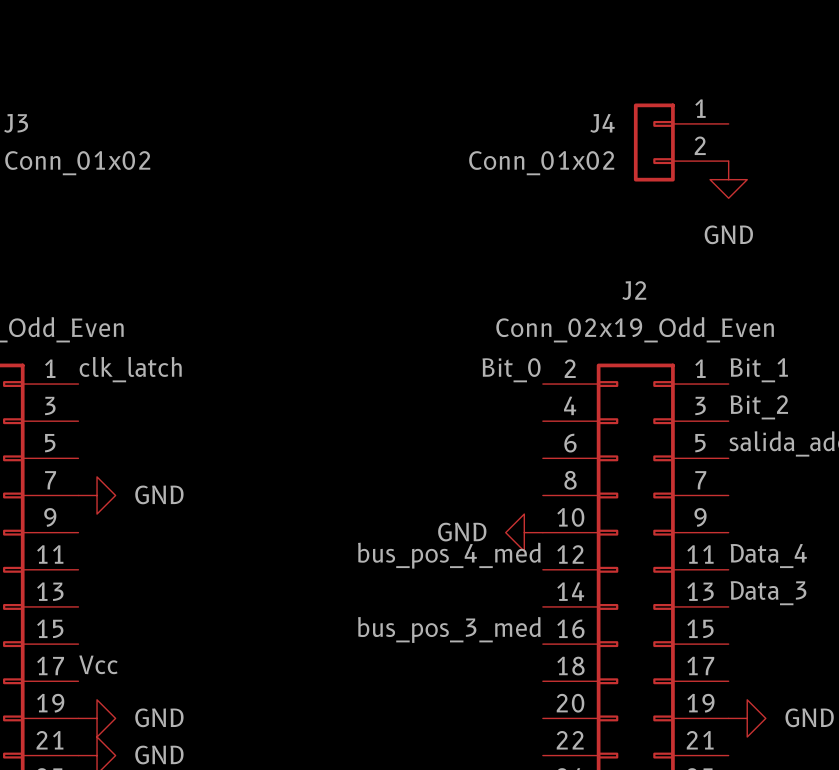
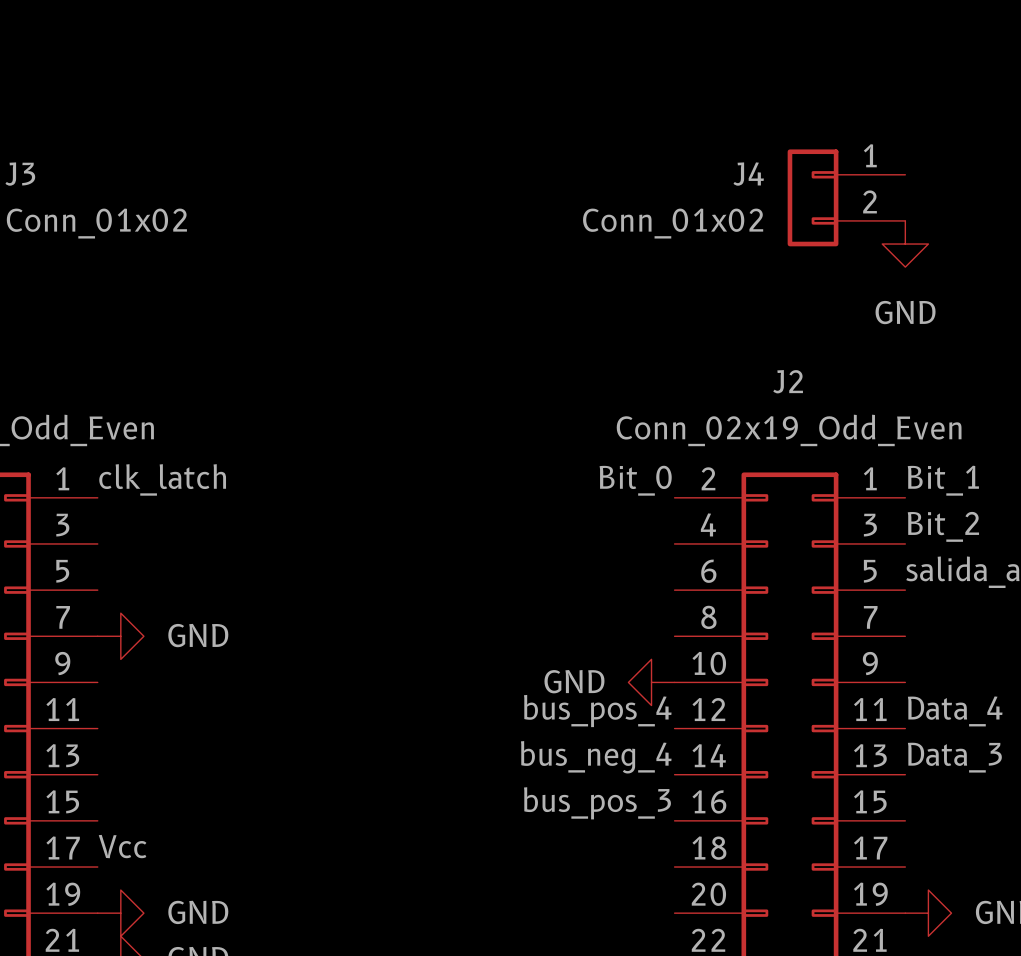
label: bus_pos_4_med (449, 555) -> bus_pos_4 (597, 711)
label: none -> bus_neg_4 (596, 757)
label: bus_pos_3_med (449, 629) -> bus_pos_3 (597, 803)

